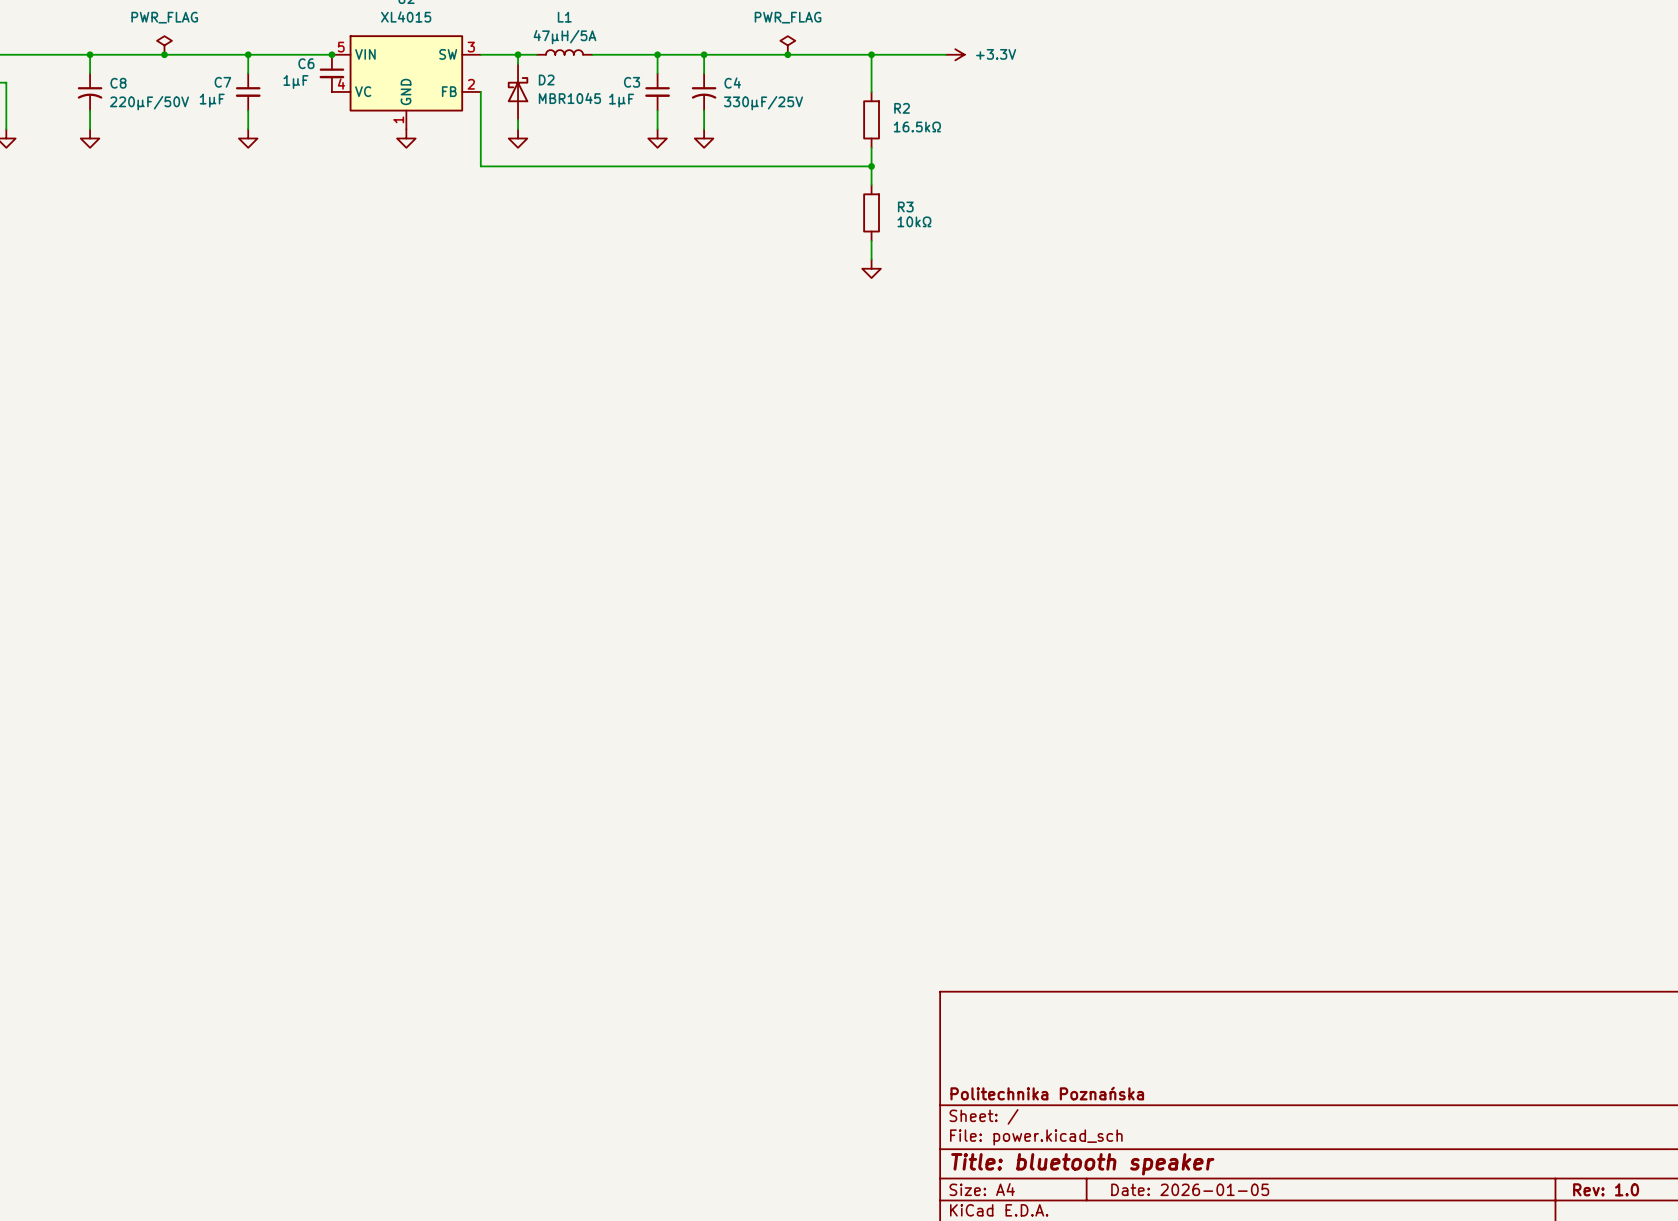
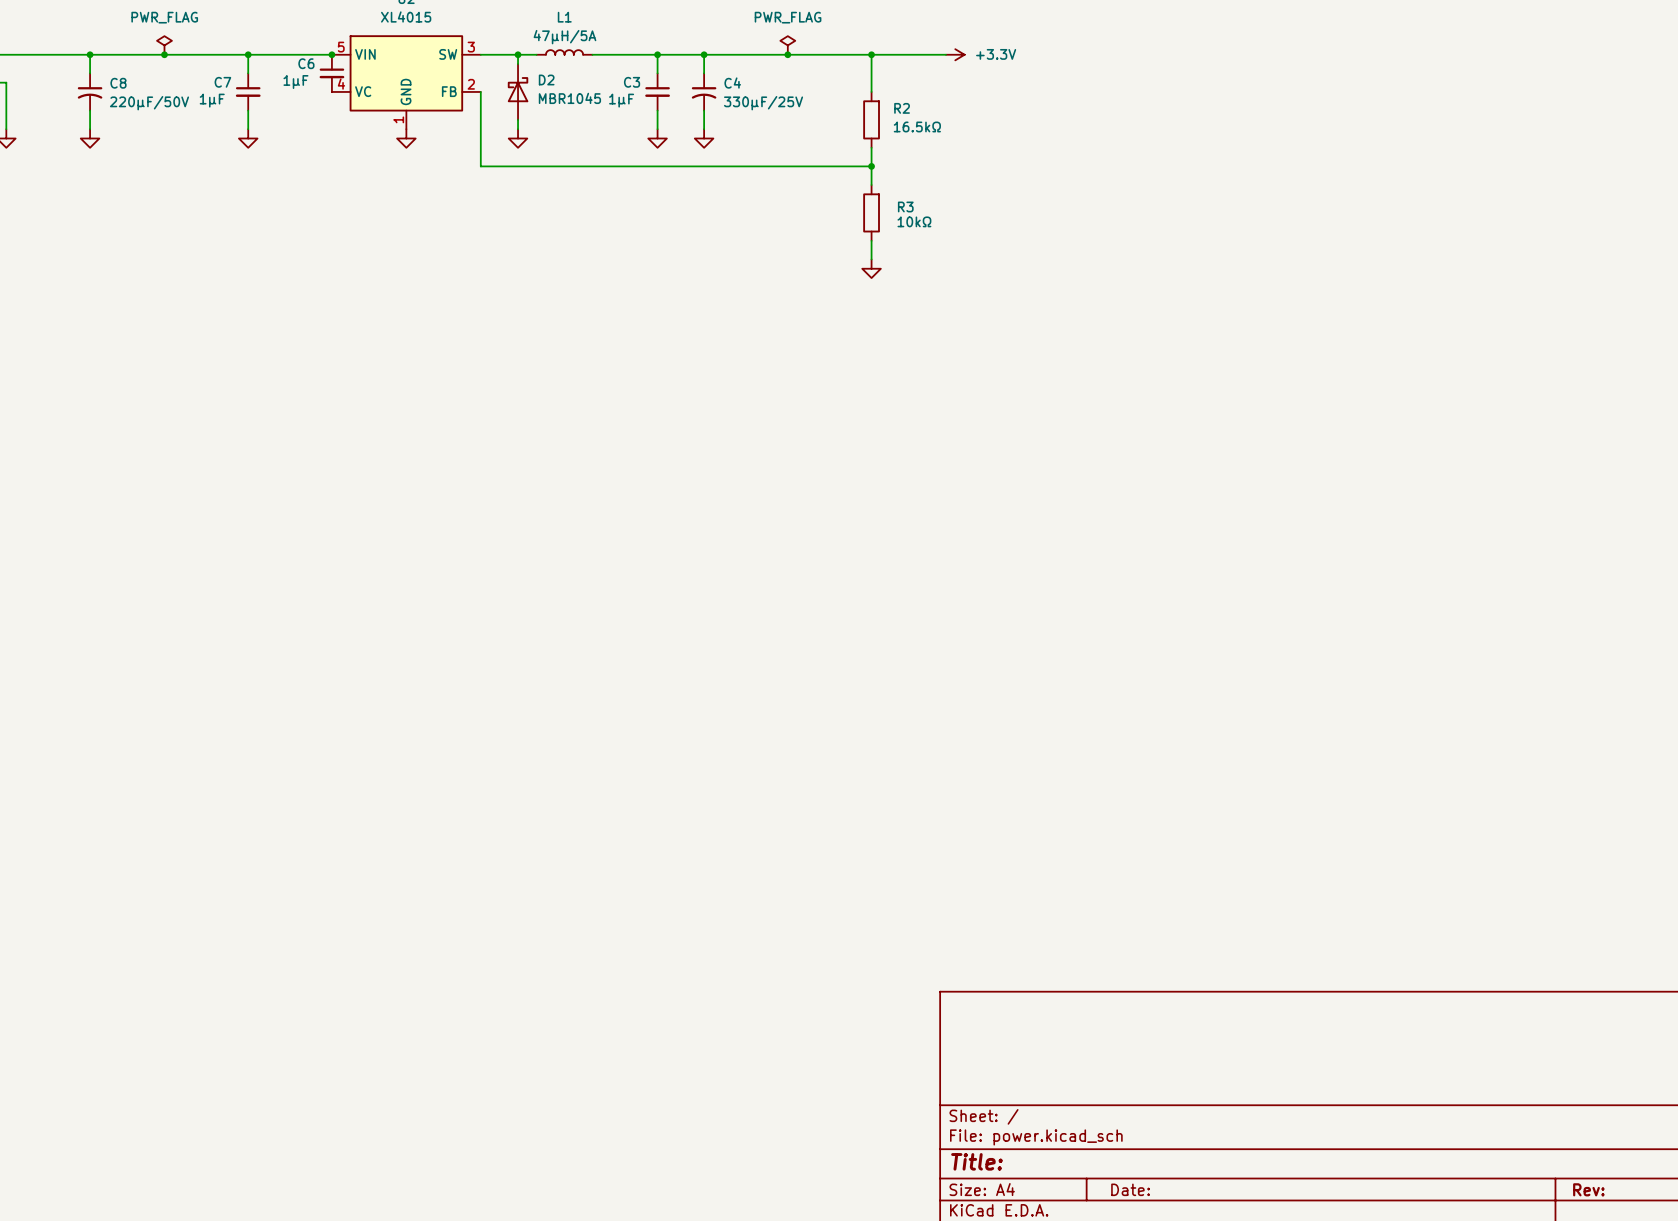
title block: Politechnika Poznańska (1047, 1093) -> none
title block: Title: bluetooth speaker (1082, 1164) -> Title: (976, 1161)
title block: Date: 2026-01-05 (1190, 1189) -> Date: (1130, 1189)
title block: Rev: 1.0 (1606, 1189) -> Rev: (1588, 1189)

